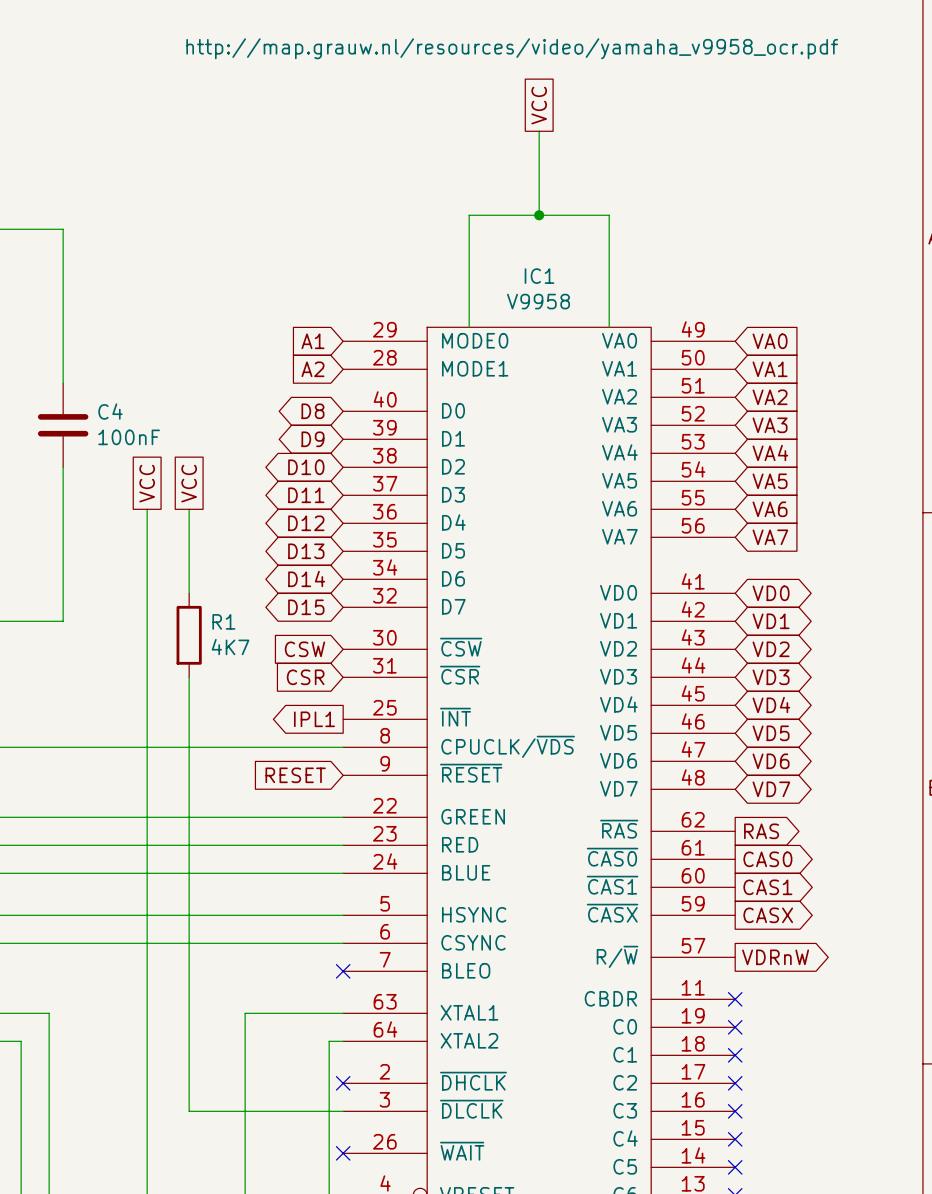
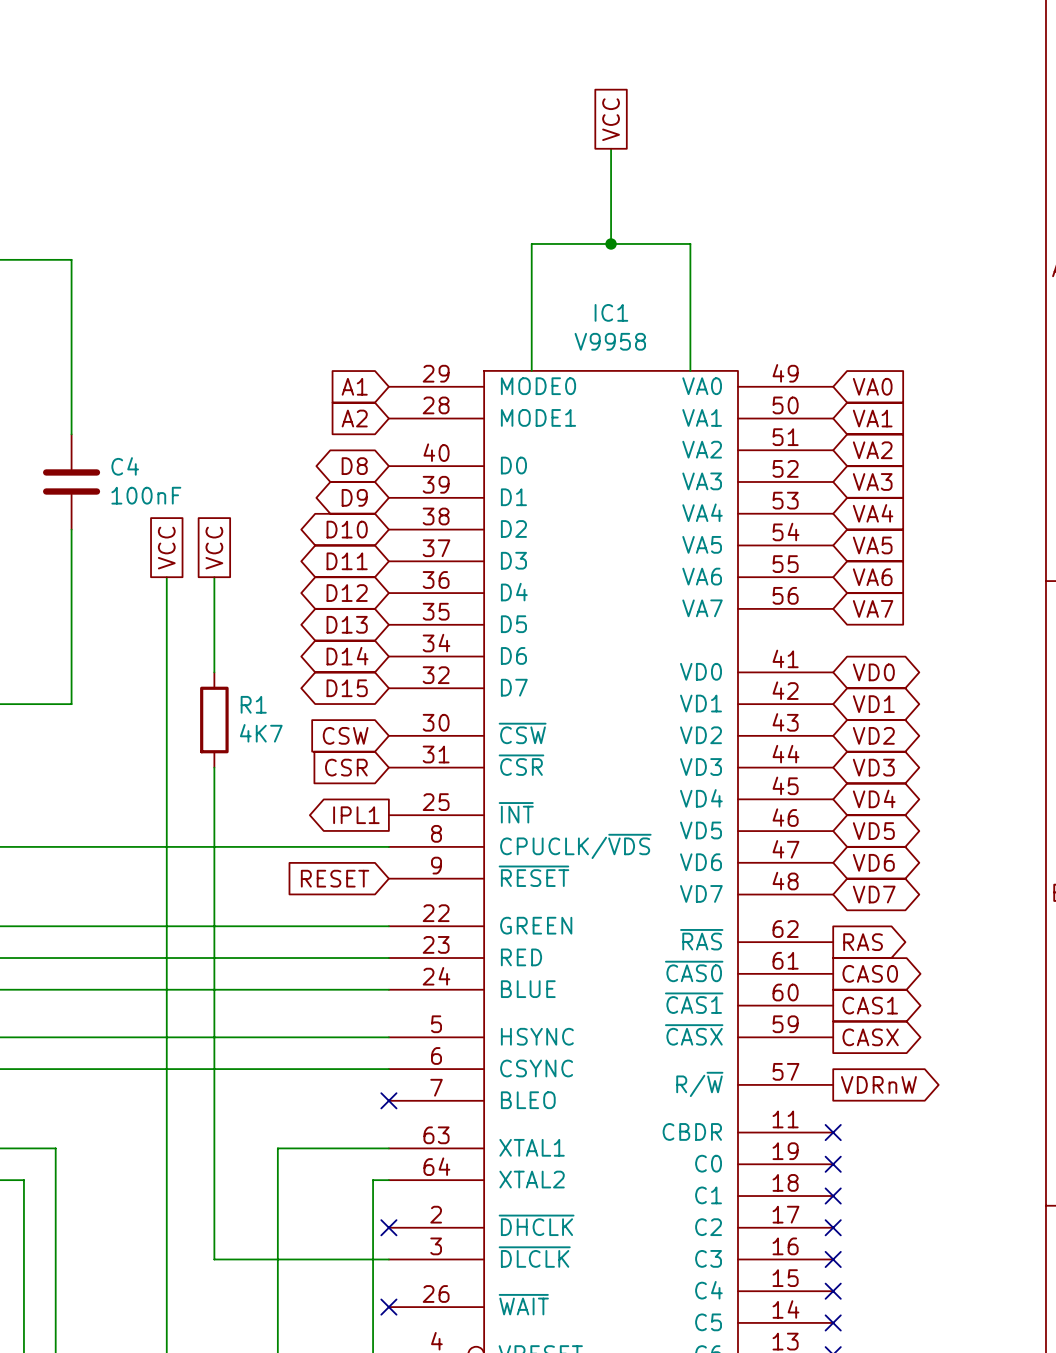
IC1 text: http://map.grauw.nl/resources/video/yamaha_v9958_ocr.pdf (512, 48) -> none

